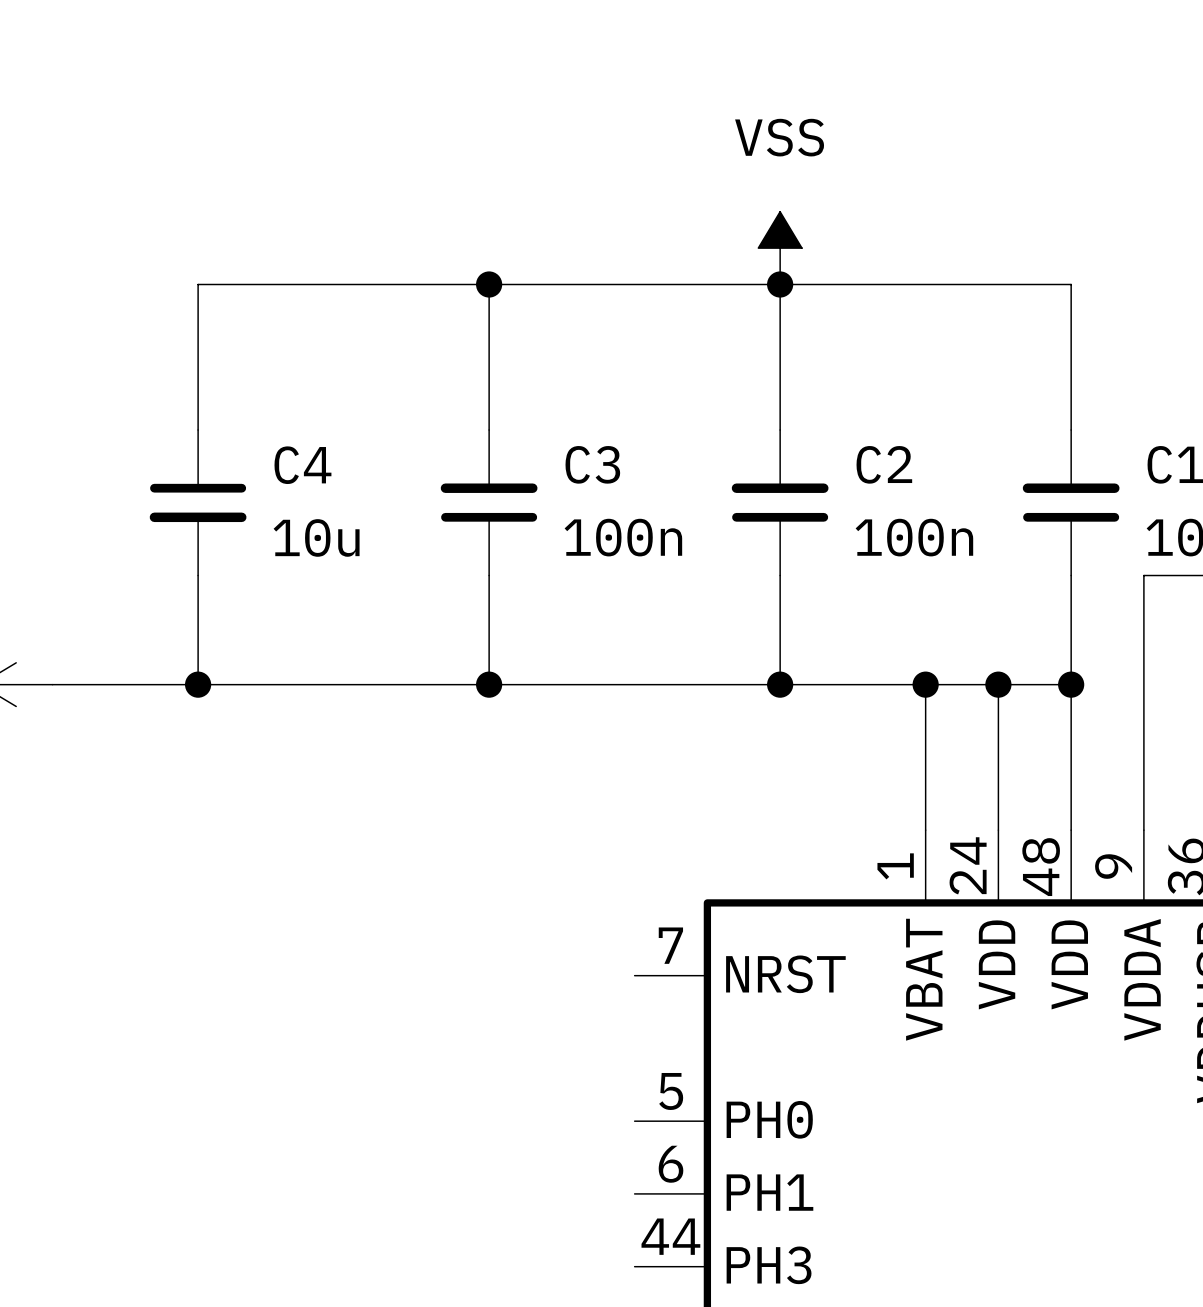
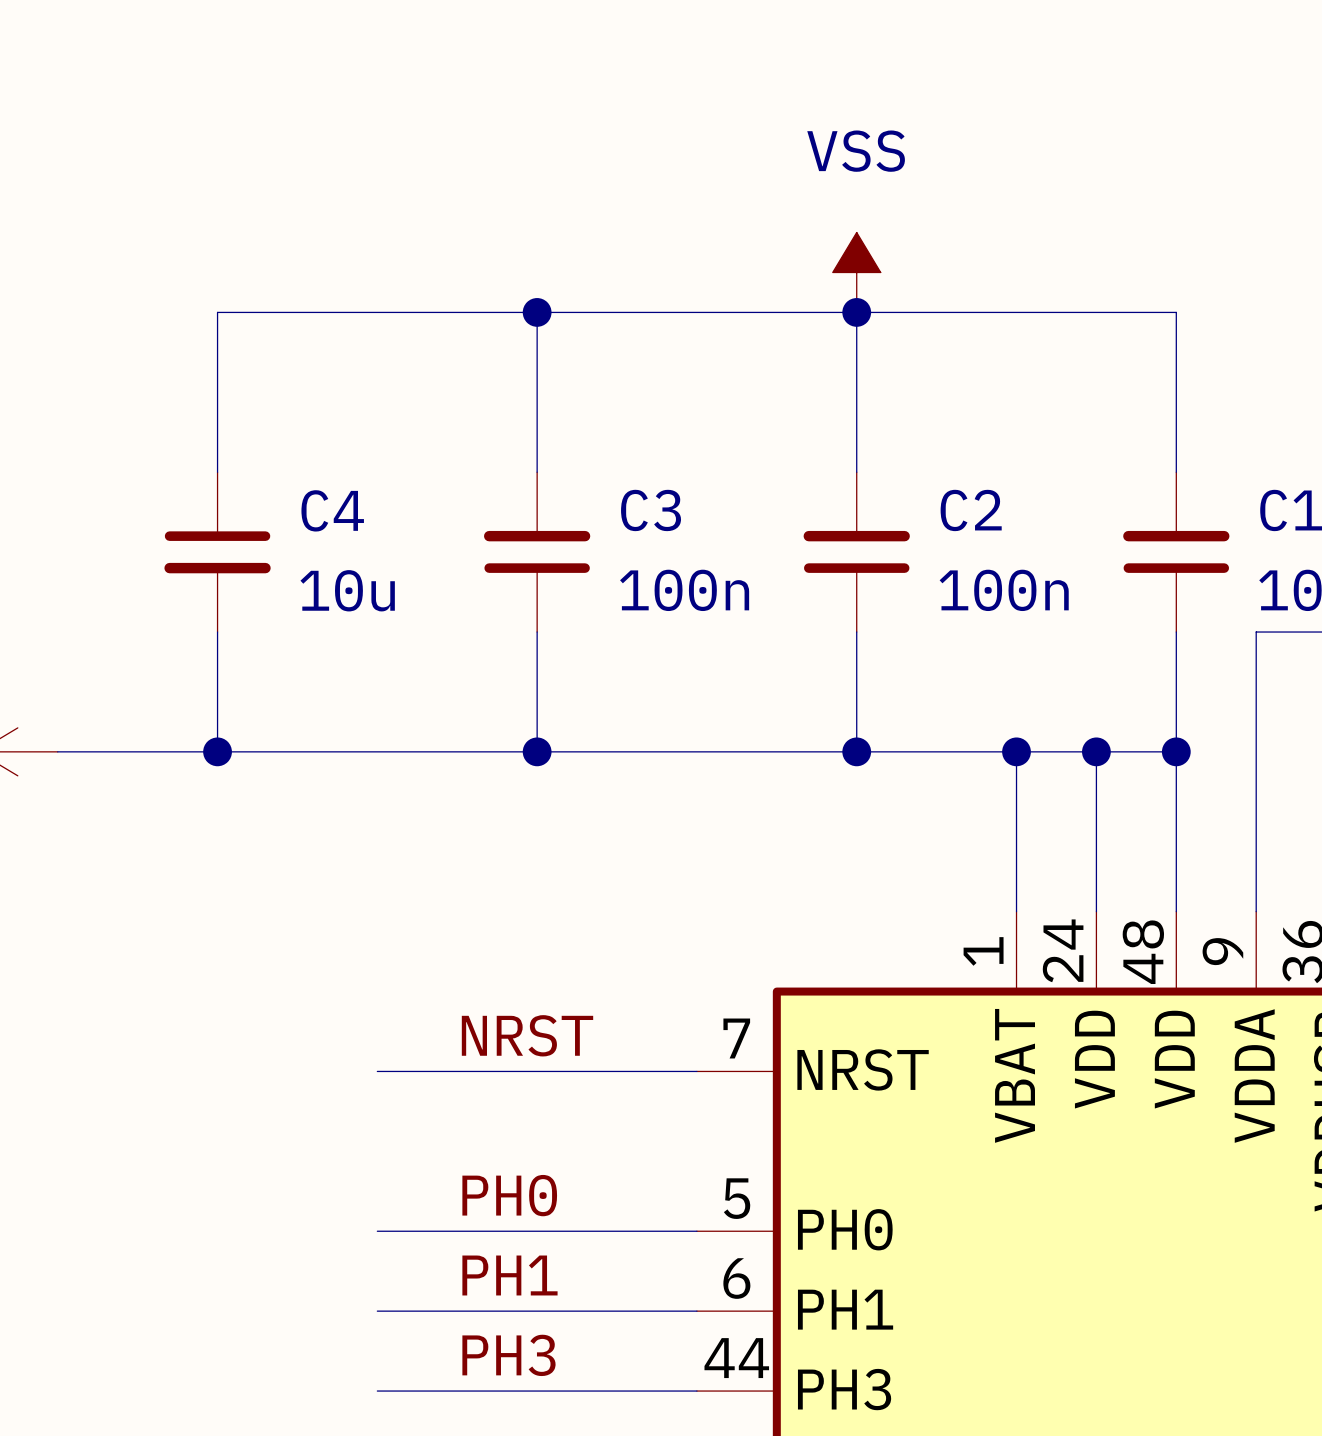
label: none -> NRST (527, 1035)
wire: none -> (377, 1071) (696, 1071)
label: none -> PH0 (509, 1195)
wire: none -> (377, 1231) (696, 1231)
label: none -> PH1 (509, 1275)
wire: none -> (377, 1311) (696, 1311)
label: none -> PH3 (508, 1355)
wire: none -> (377, 1391) (696, 1391)

